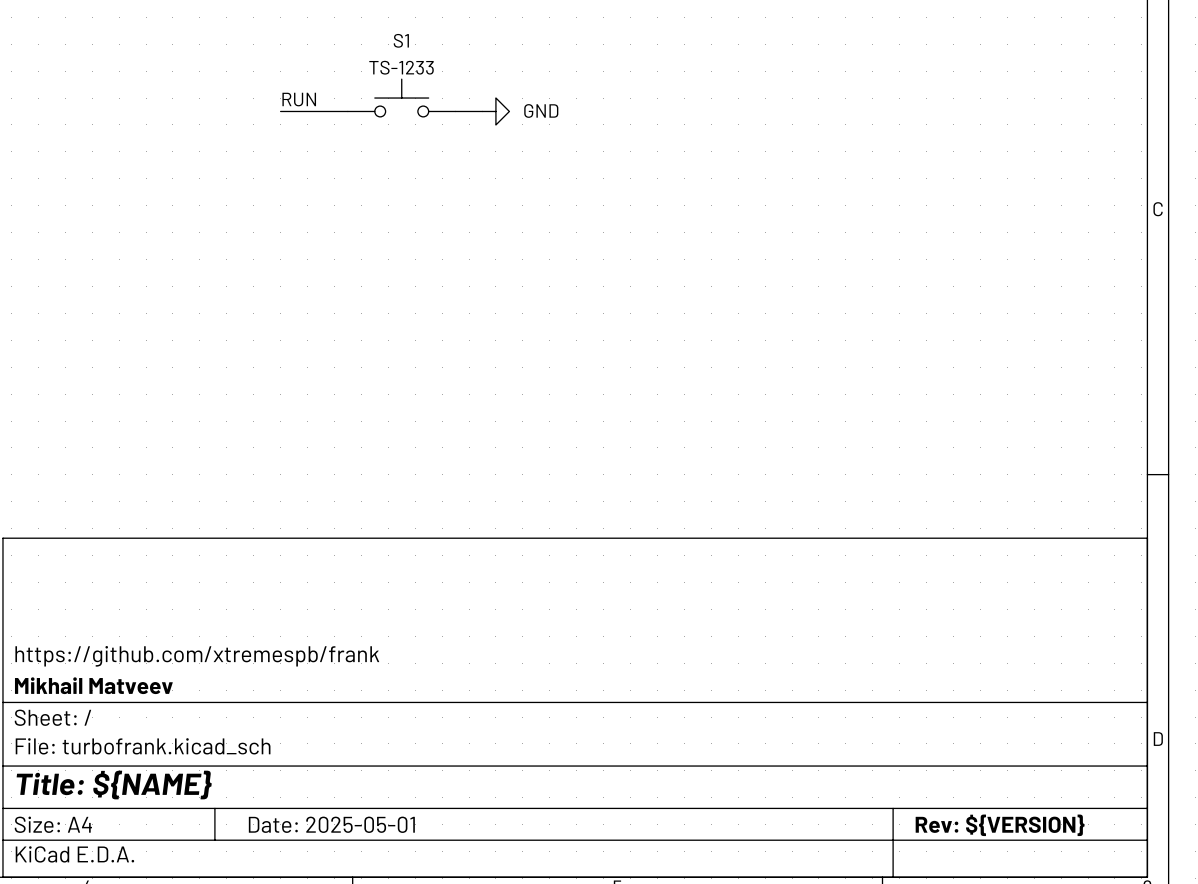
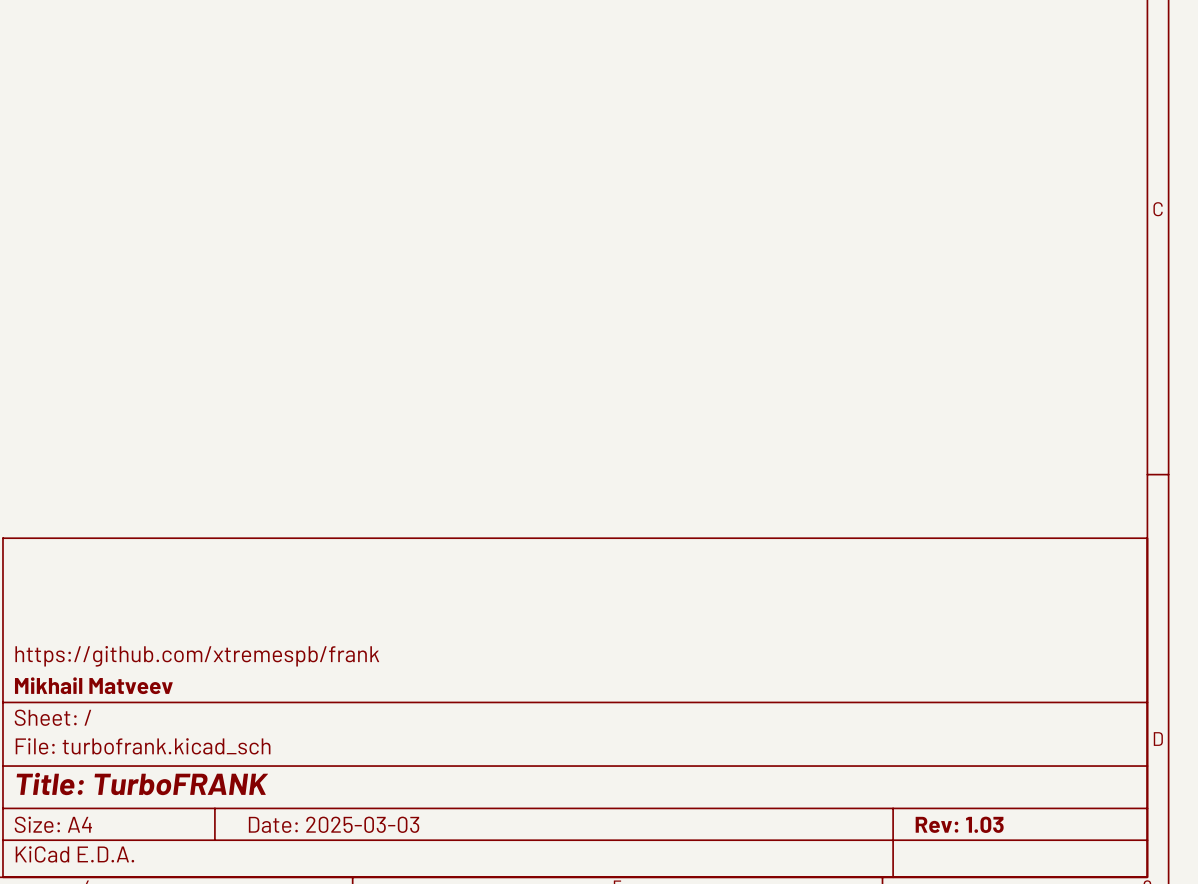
S1: TS-1233 (401, 98) -> none
label: RUN (299, 99) -> none
wire: (280, 111) (347, 111) -> none
wire: (455, 111) (482, 111) -> none
power symbol: GND (495, 111) -> none
title block: Title: ${NAME} (114, 785) -> Title: TurboFRANK (142, 783)
title block: Date: 2025-05-01 (331, 824) -> Date: 2025-03-03 (334, 824)
title block: Rev: ${VERSION} (1000, 825) -> Rev: 1.03 (959, 824)

